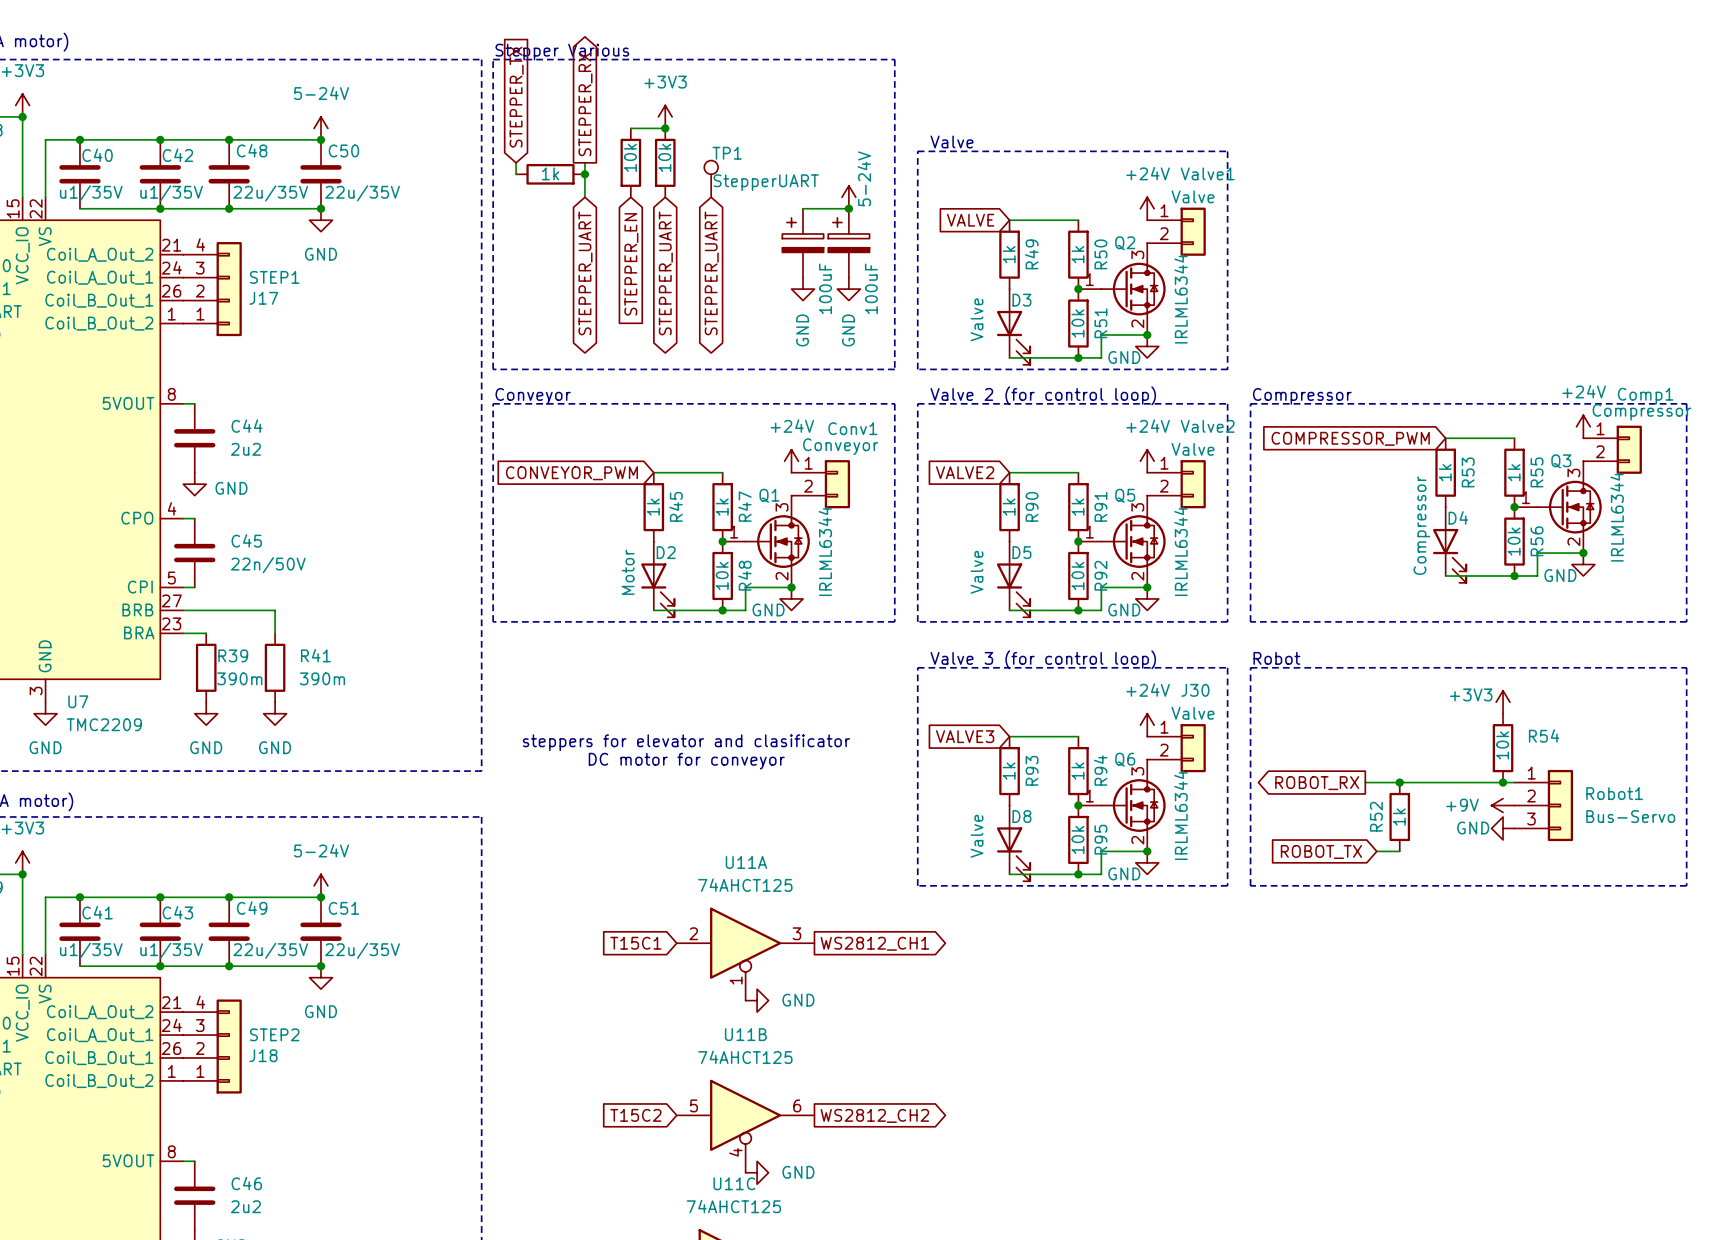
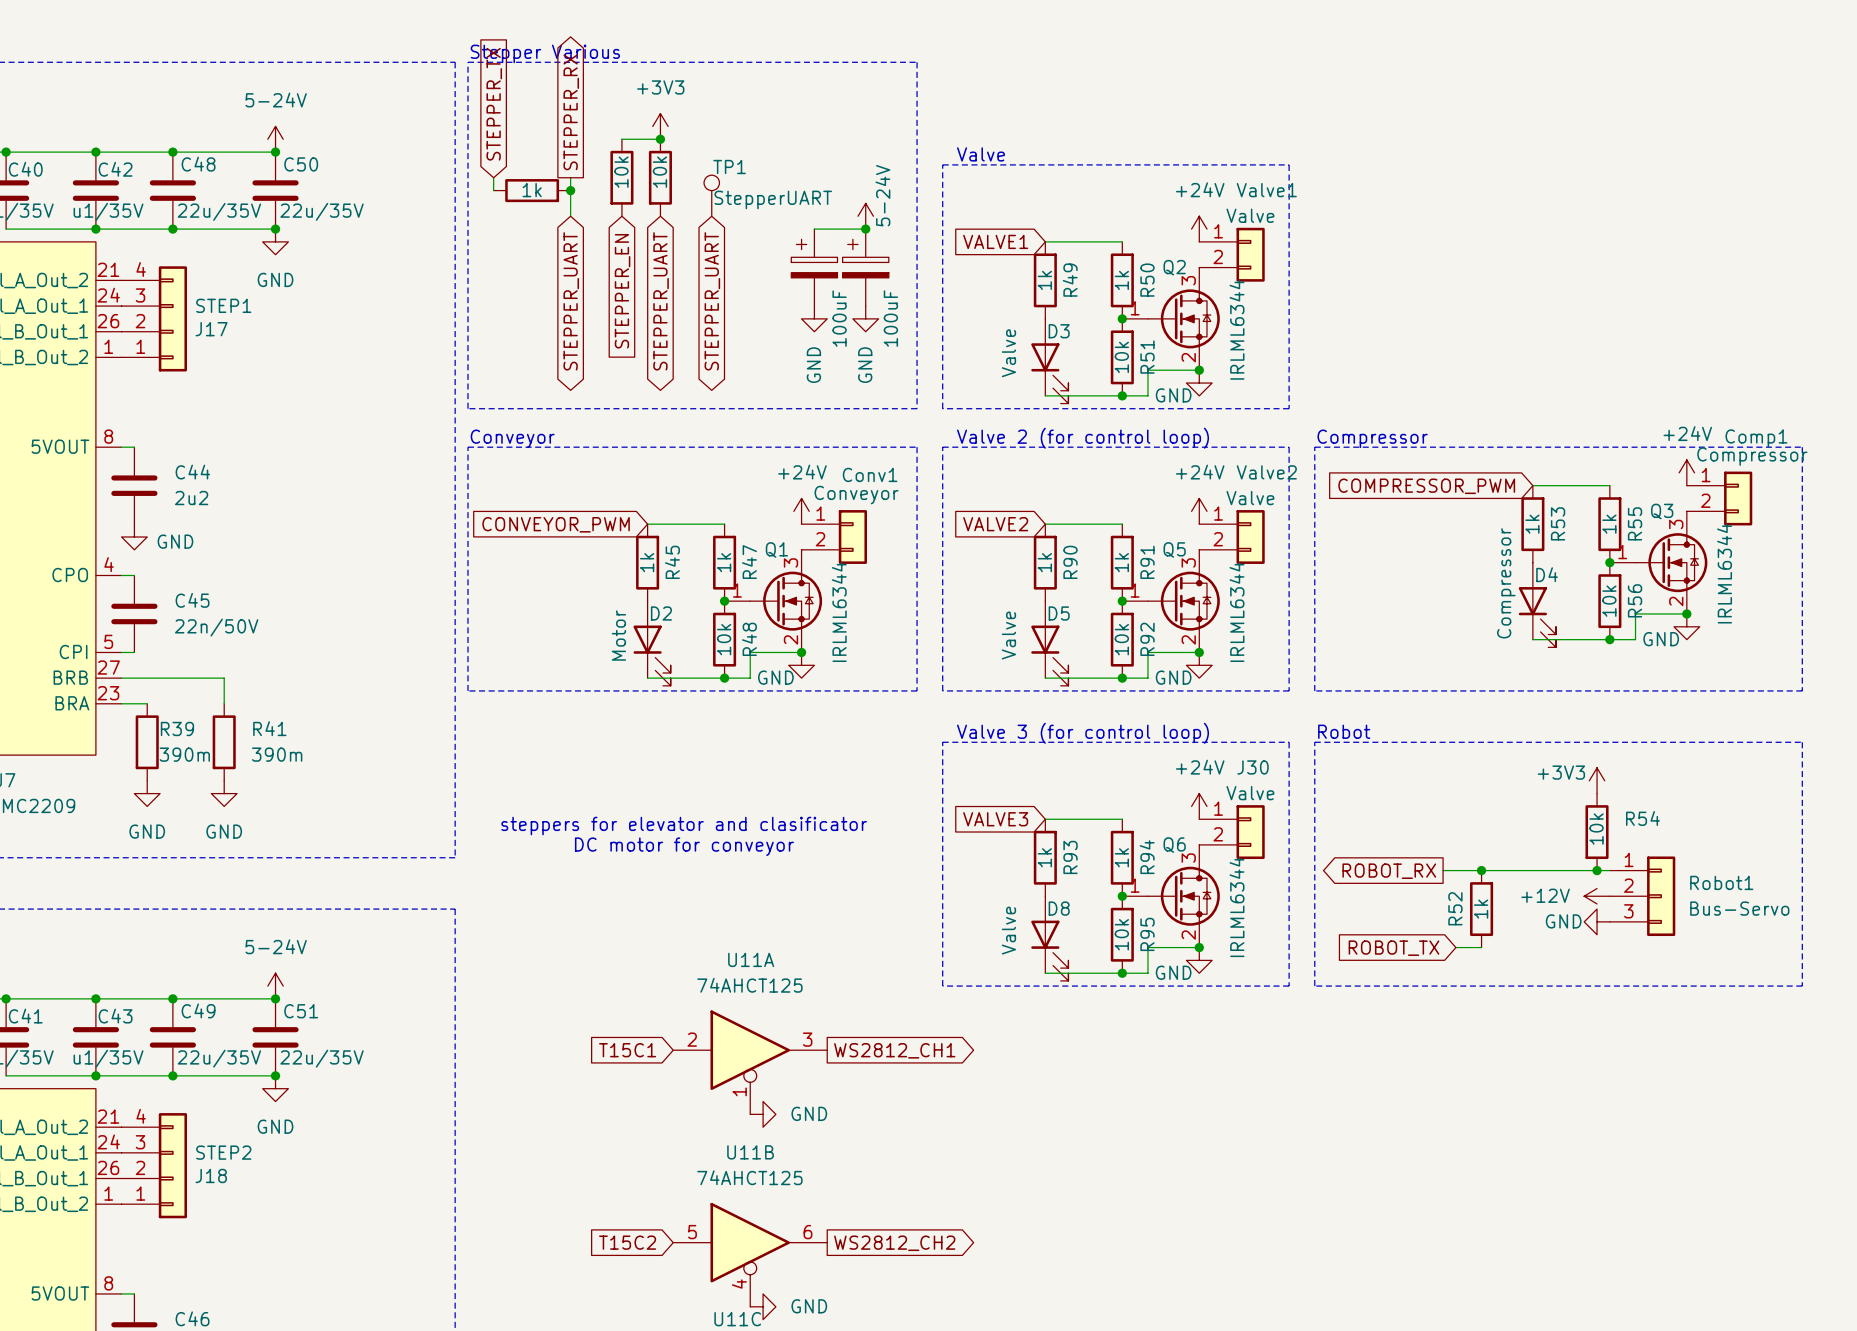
global label: VALVE (970, 220) -> VALVE1 (995, 241)
power symbol: +9V (1503, 805) -> +12V (1597, 896)

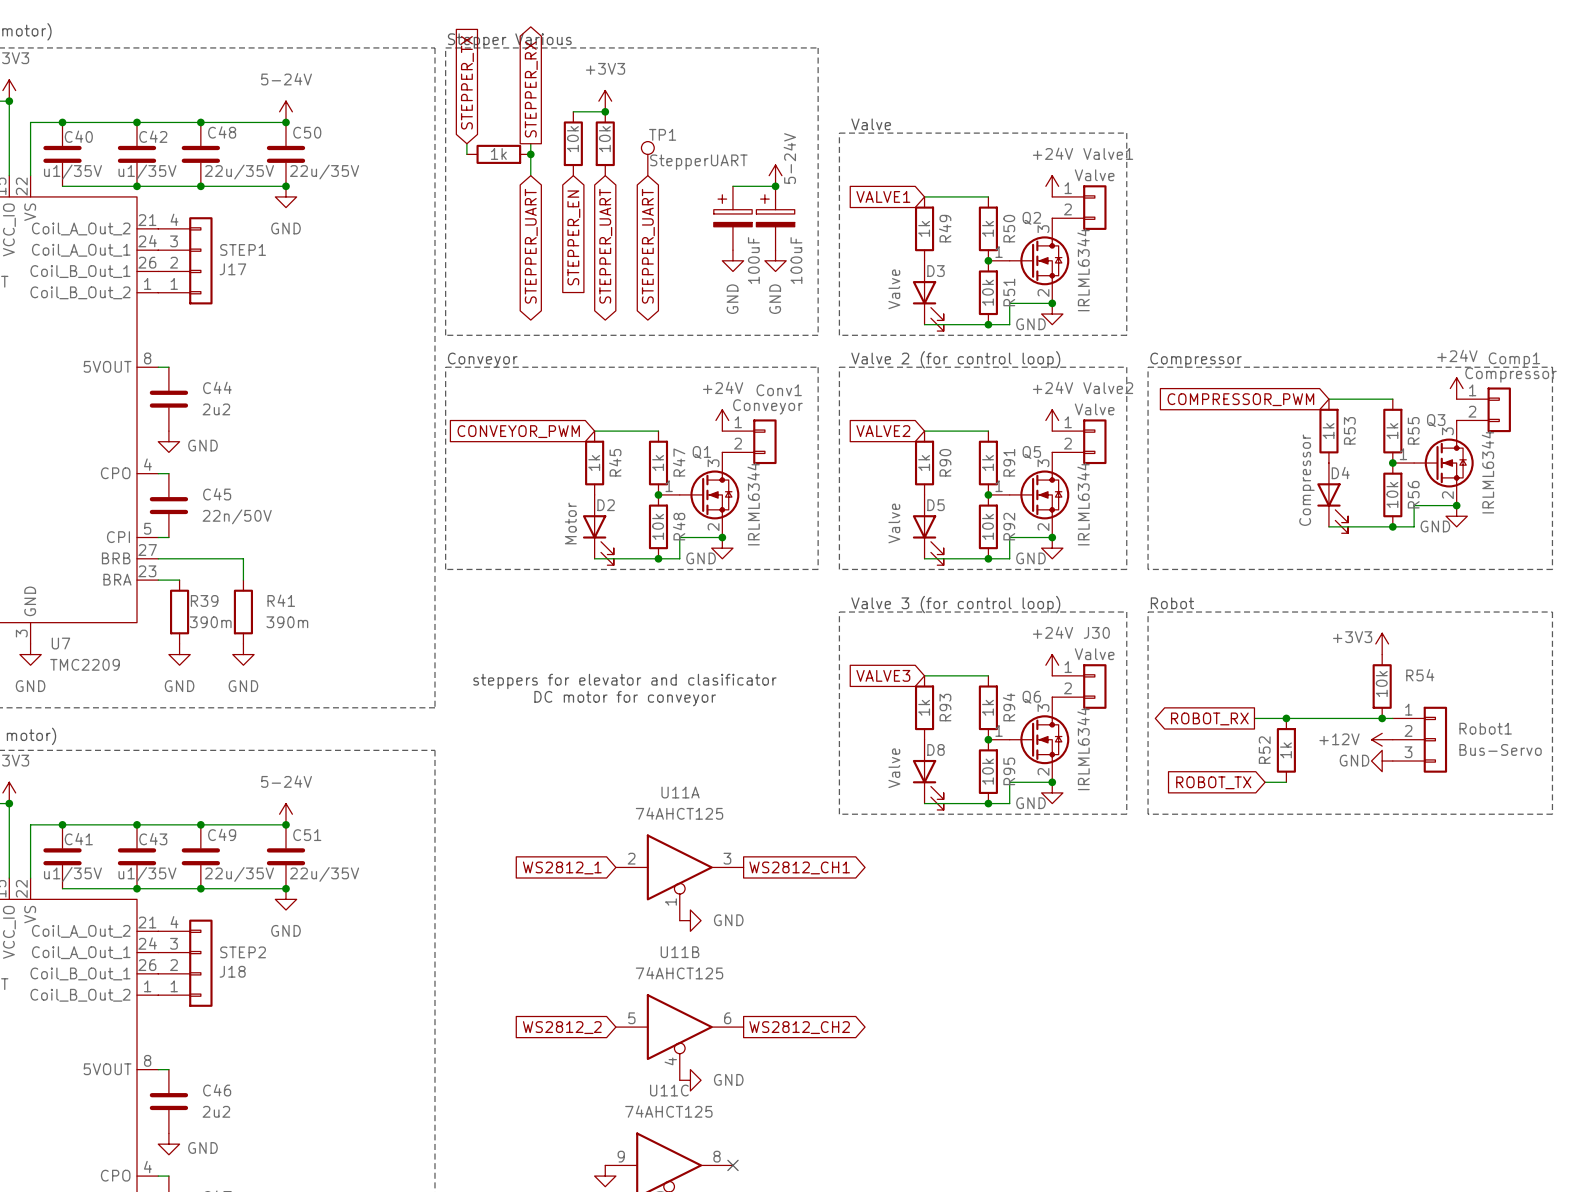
global label: T15C1 (627, 1050) -> WS2812_1 (562, 867)
global label: T15C2 (627, 1242) -> WS2812_2 (562, 1027)

